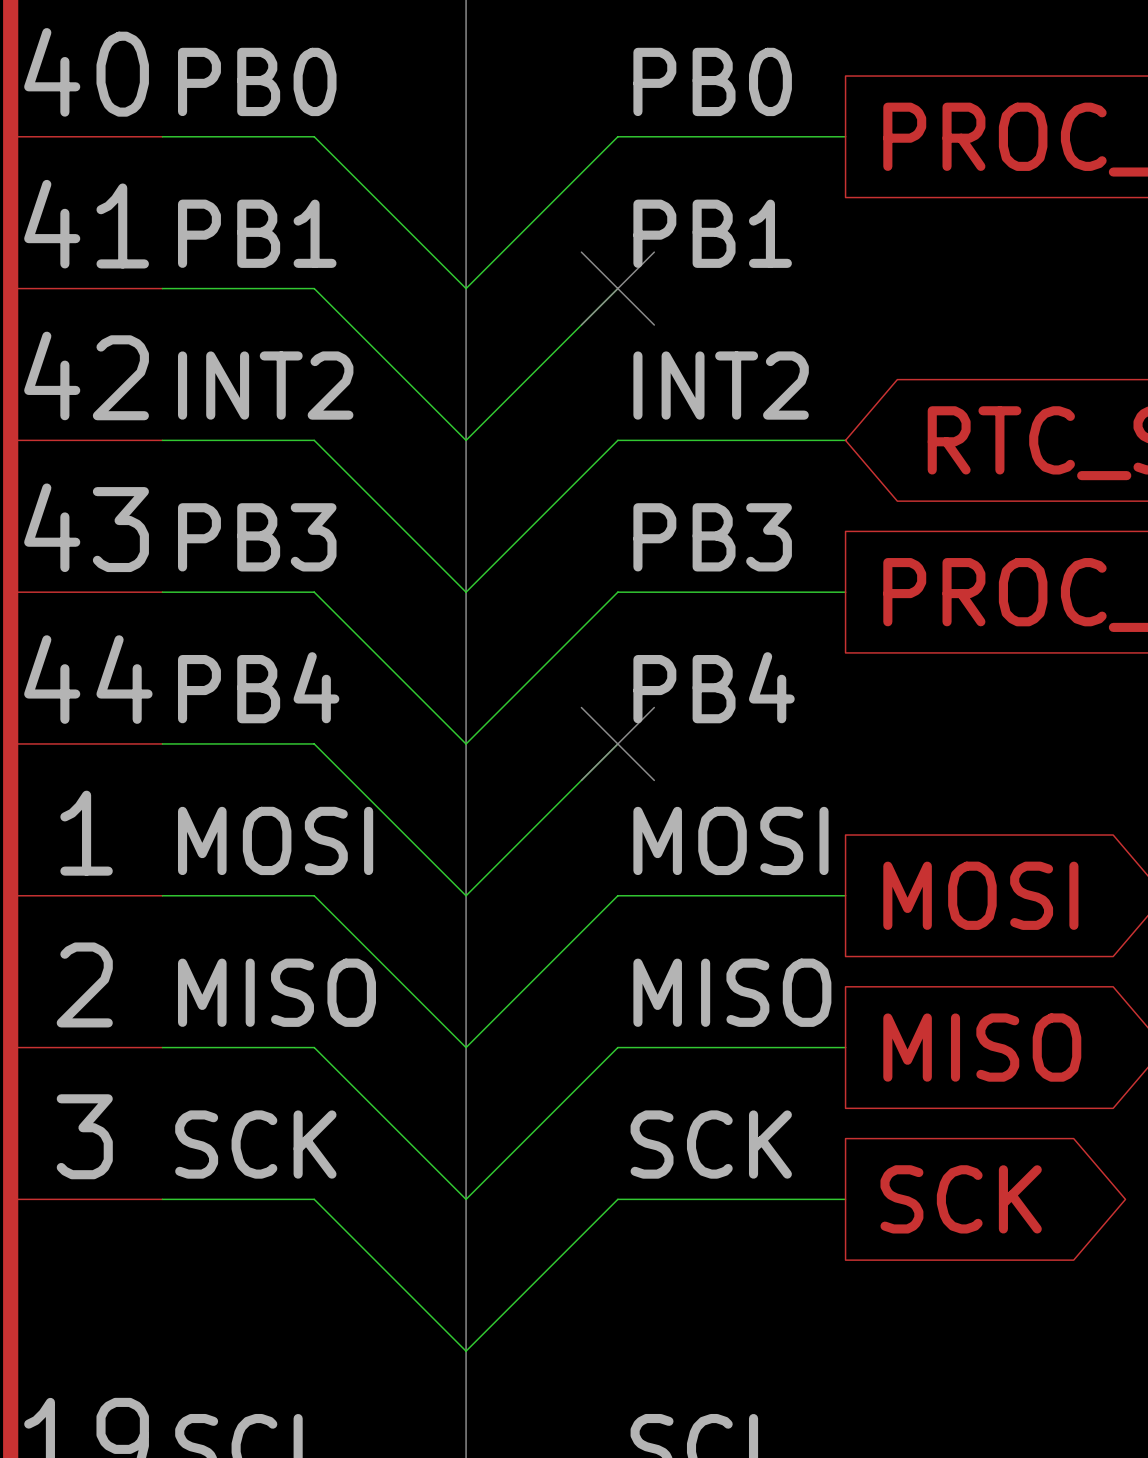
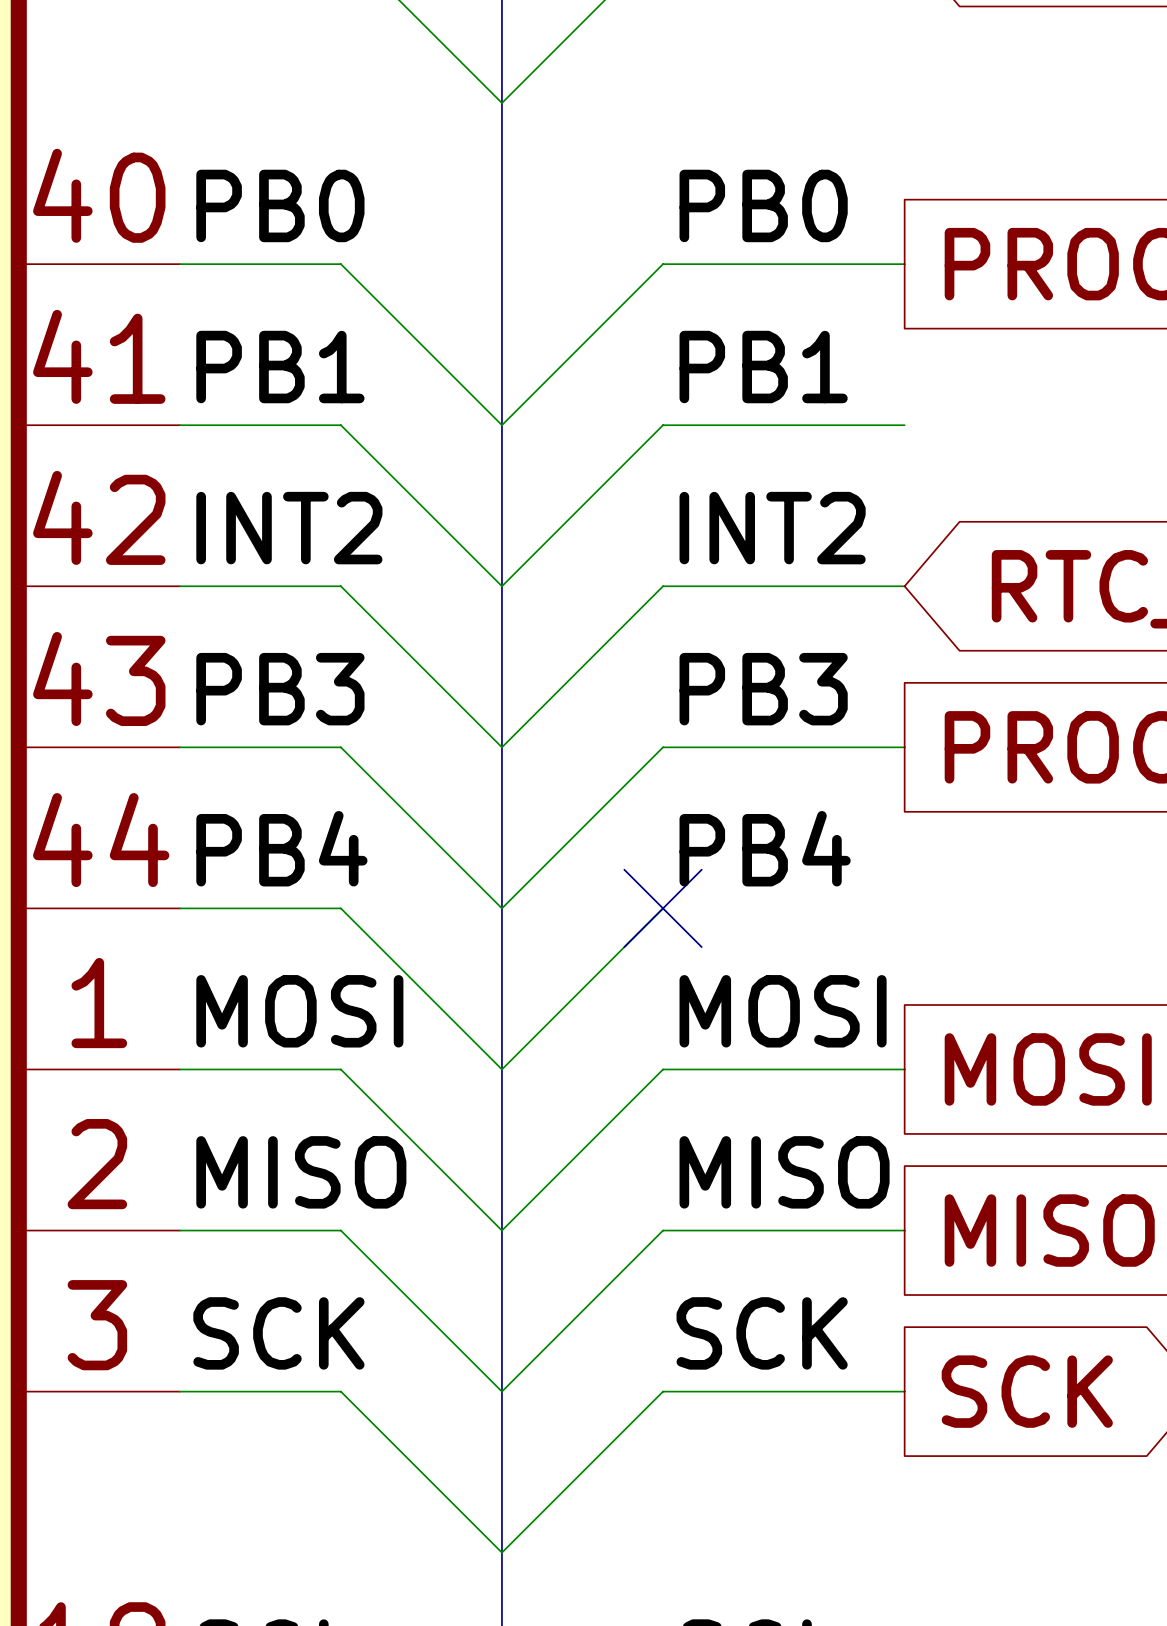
wire: none -> (663, 425) (904, 425)
no-connect mark: (617, 288) -> none

